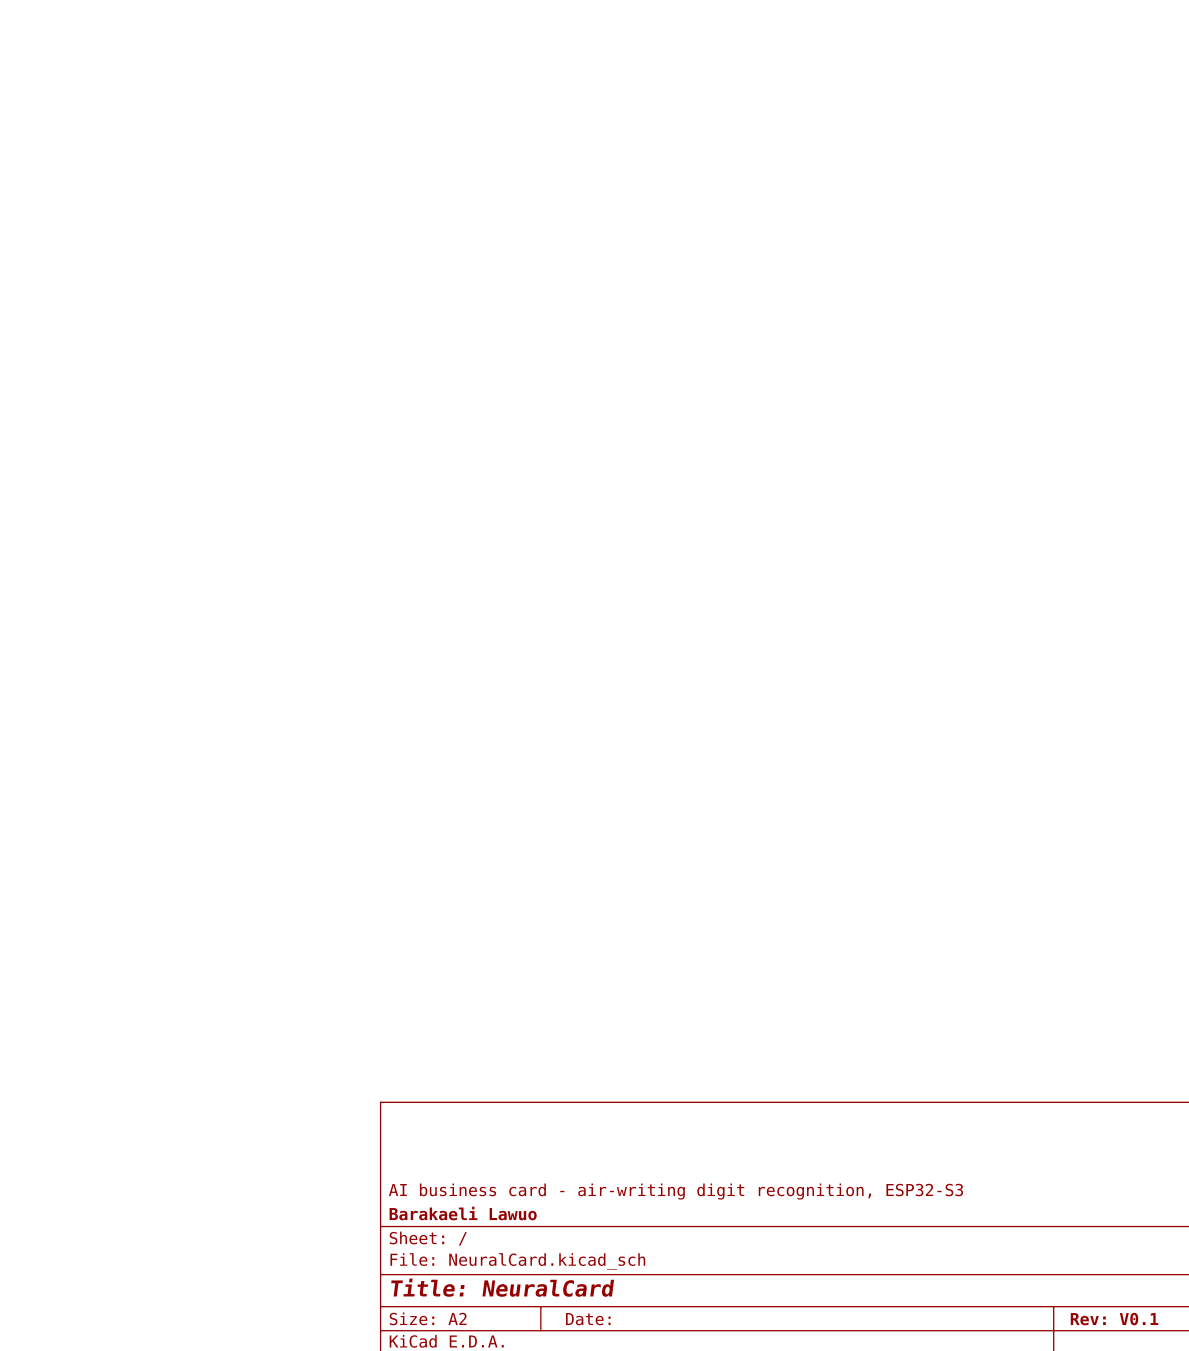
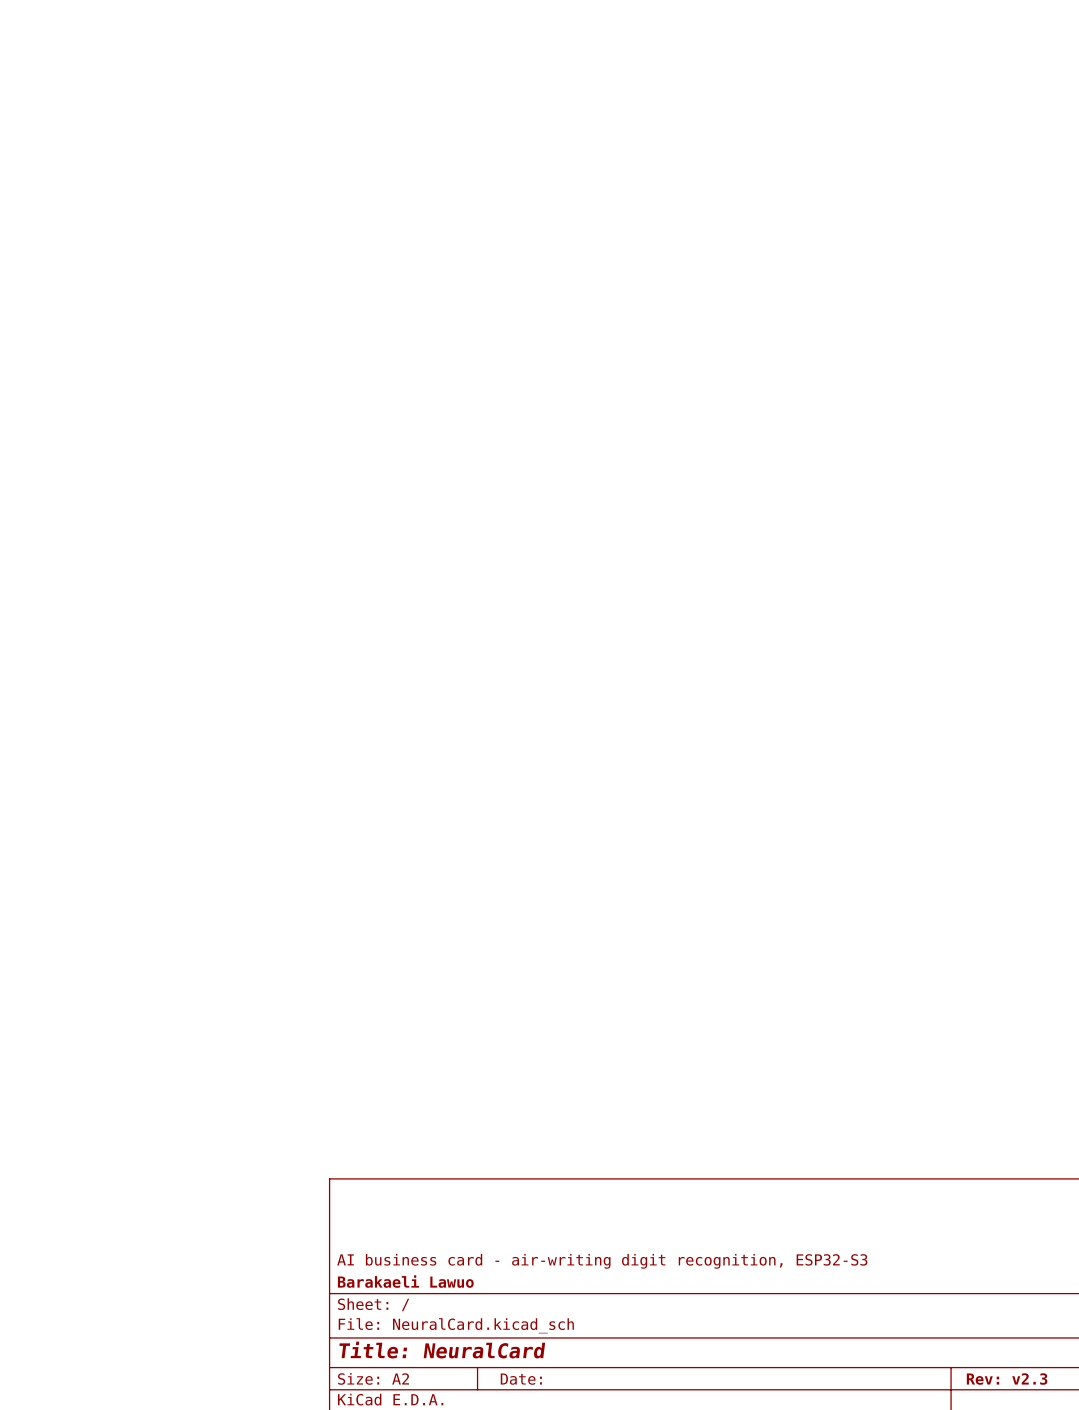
title block: Rev: V0.1 (1114, 1319) -> Rev: v2.3 (1007, 1379)

